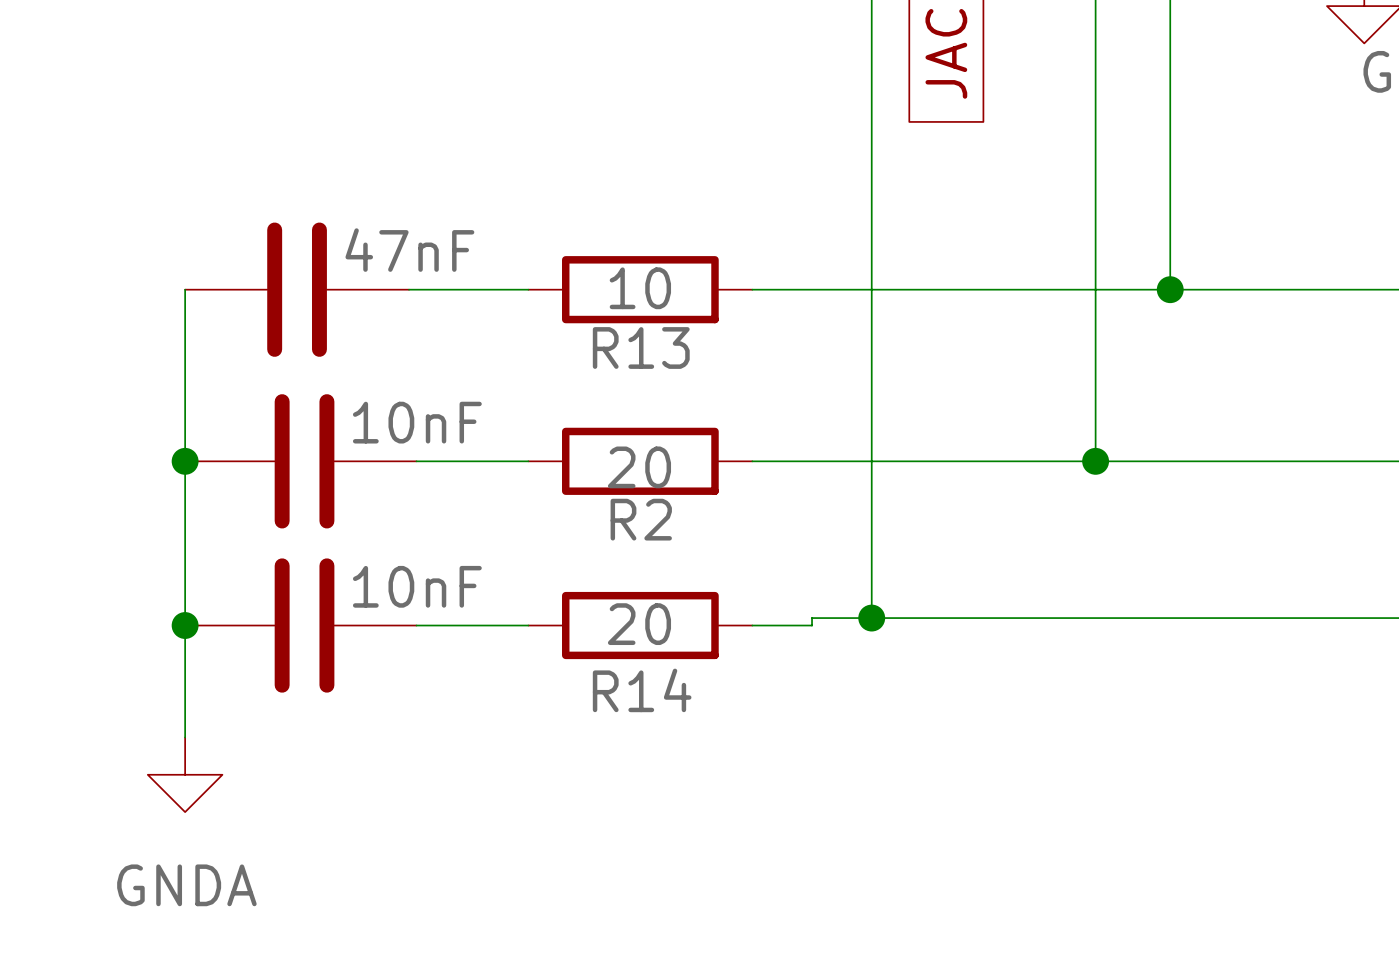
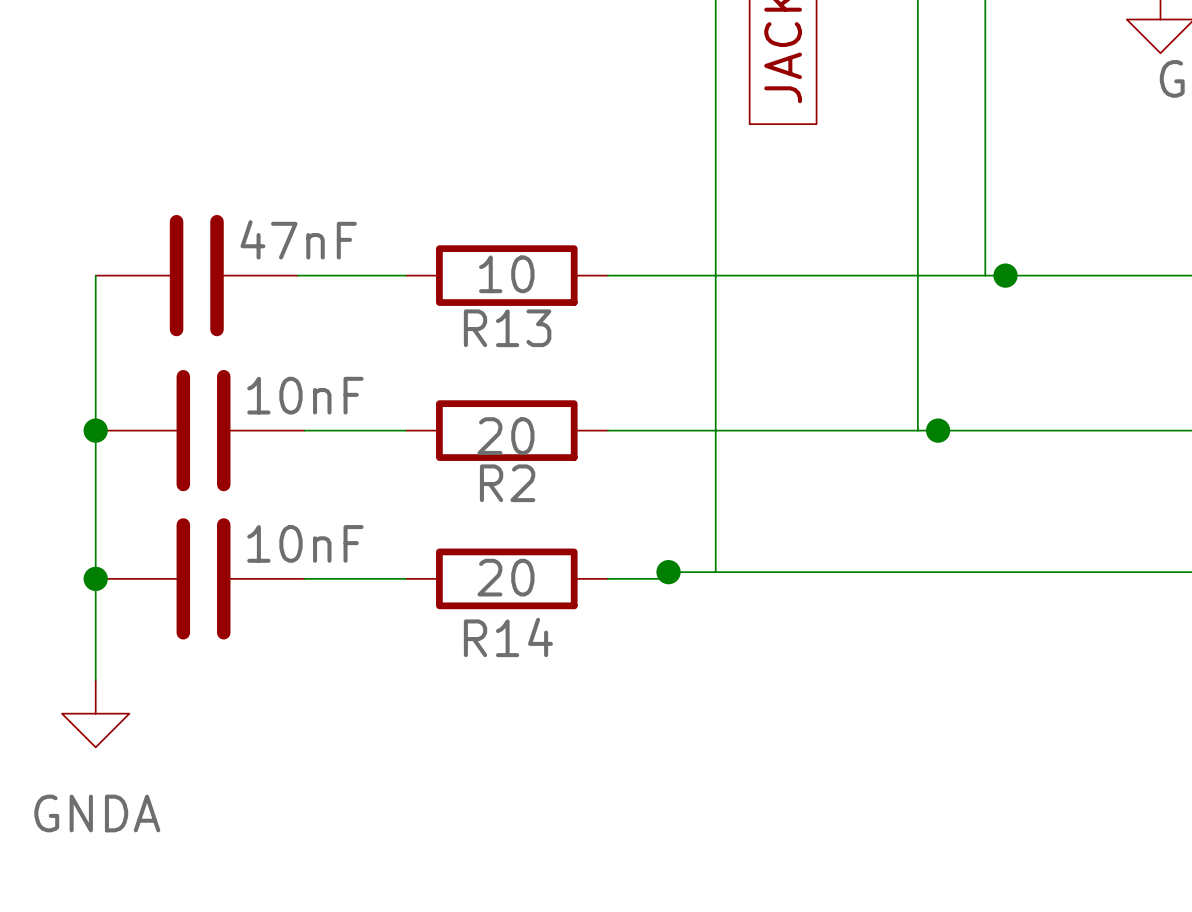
junction position: (1170, 289) -> (1005, 275)
junction position: (1095, 461) -> (938, 430)
junction position: (871, 618) -> (668, 572)

